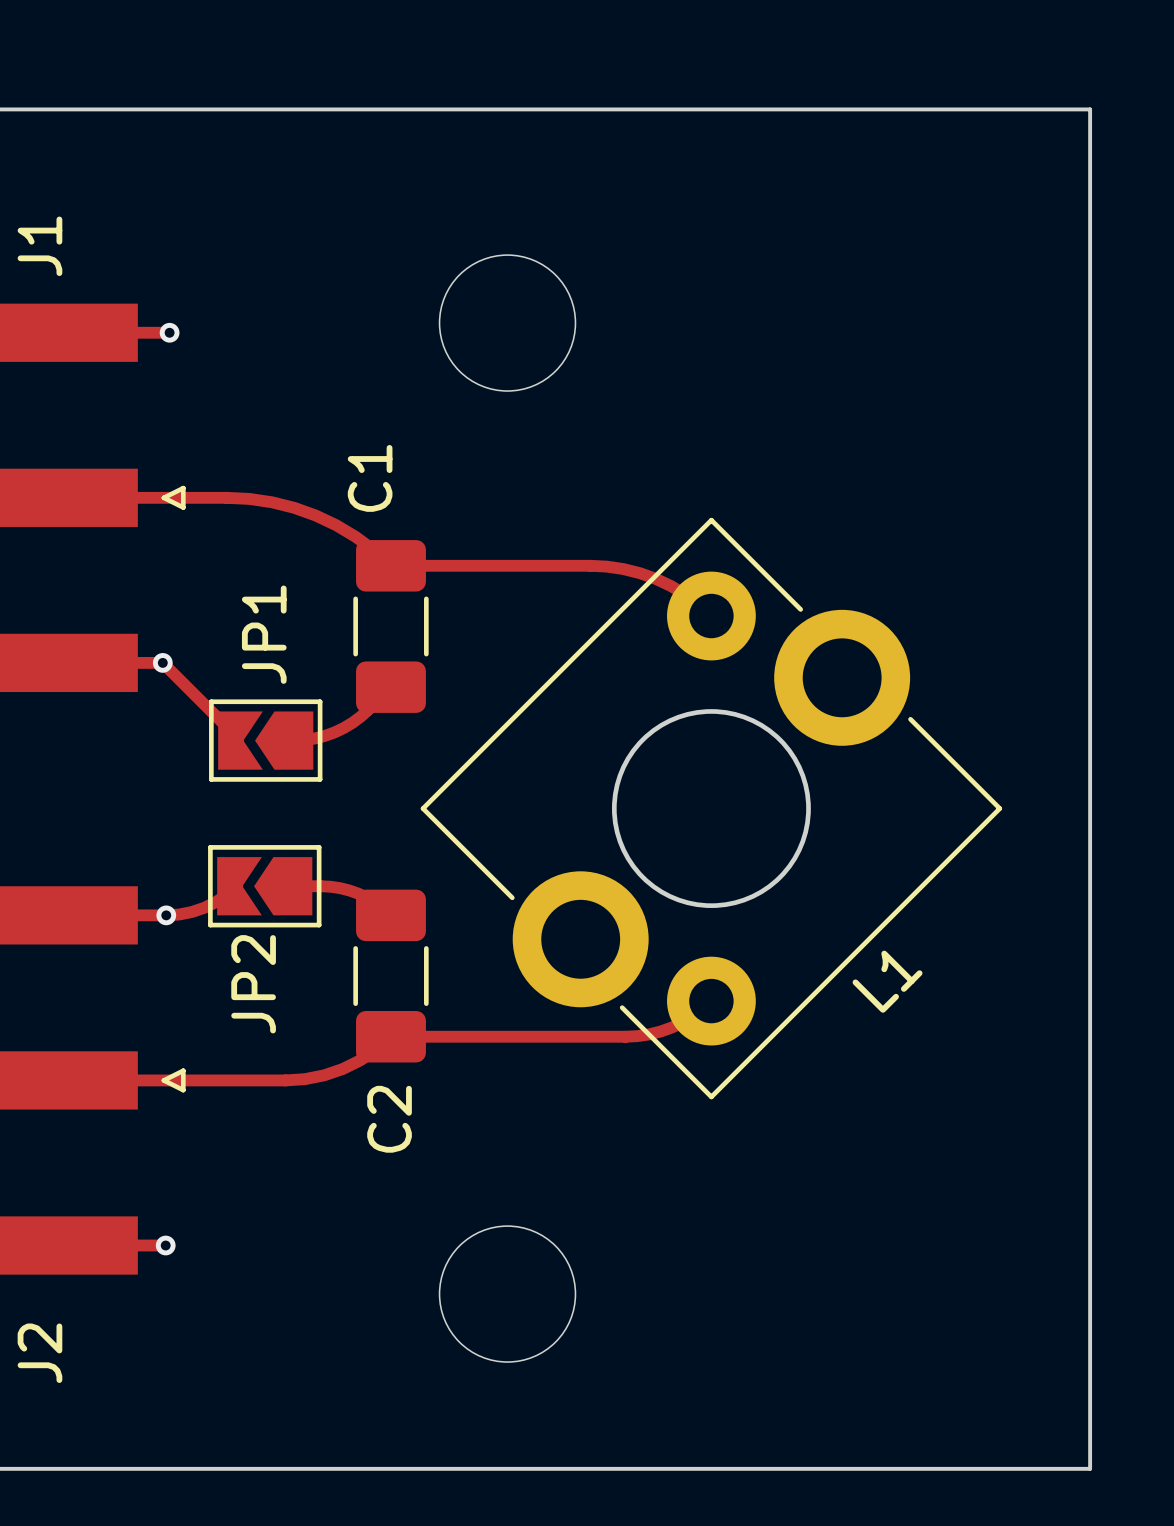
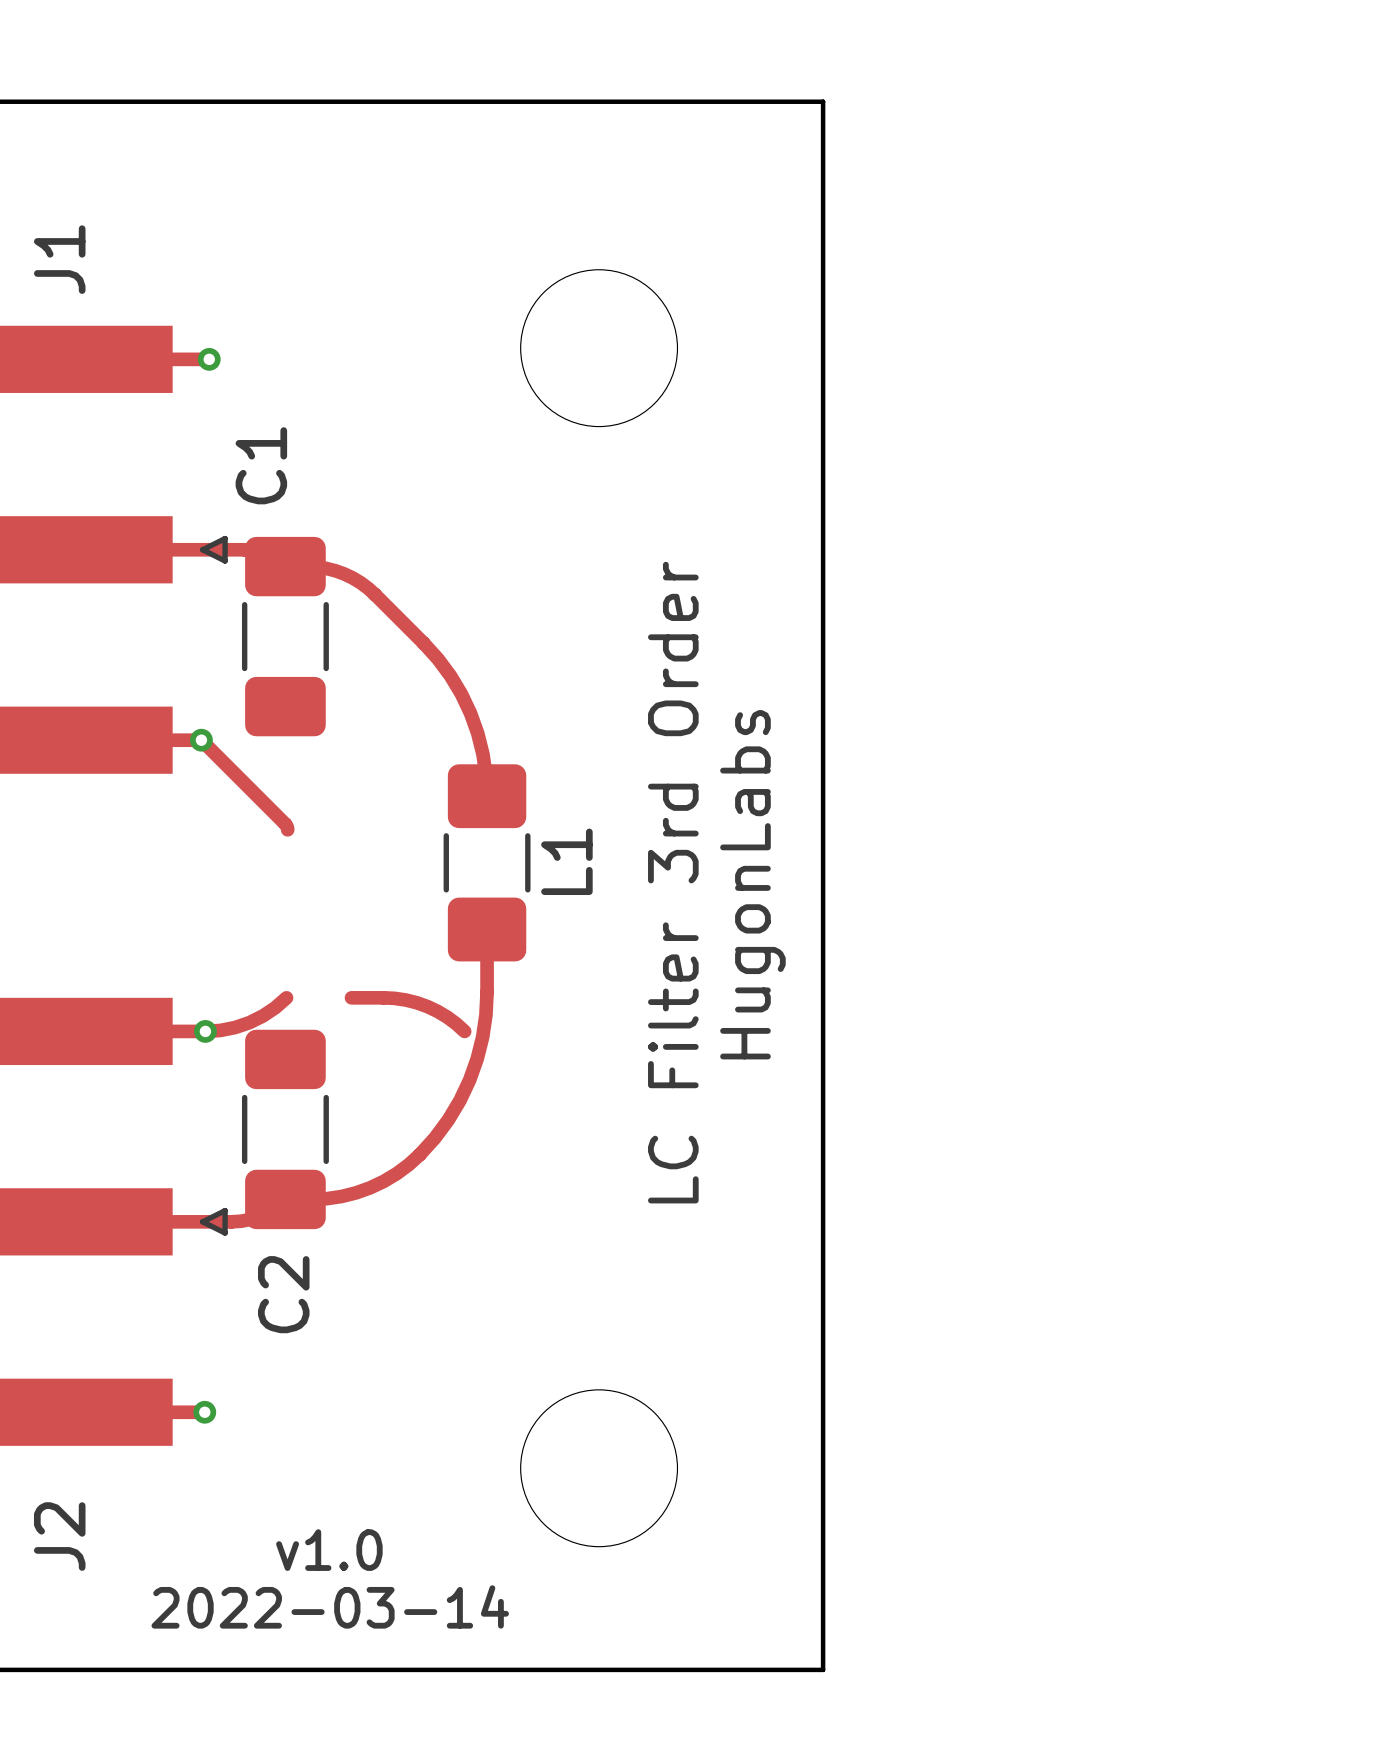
board edge: (701, 109) (1090, 109) (1090, 1468) (701, 1468) -> (823, 101) (823, 1669)
track: (200, 497) (249, 498) (294, 507) (336, 525) (355, 536) (390, 565) (590, 565) (623, 569) (639, 573) (671, 586) (685, 594) (711, 616) -> (244, 549) (266, 554) (285, 566) (326, 568) (352, 577) (375, 594) (423, 643) (450, 676) (470, 713) (482, 754) (487, 796)
L1 footprint: [420, 517, 1003, 1100] -> [443, 764, 531, 962]
C1 position: (390, 626) -> (285, 636)
track: (390, 687) (360, 716) (343, 728) (324, 736) (293, 740) -> none
JP1: (265, 740) -> none
text: none -> LC Filter 3rd Order (673, 882)
text: none -> HugonLabs (752, 884)
JP2: (264, 886) -> none
C2 position: (390, 976) -> (285, 1129)
L1 name position: L1 (887, 981) -> L1 (566, 861)
track: (711, 1001) (682, 1022) (649, 1034) (625, 1036) (390, 1036) (360, 1060) (324, 1075) (285, 1080) (188, 1080) -> (487, 929) (487, 992) (482, 1037) (469, 1080) (448, 1119) (434, 1137) (408, 1164) (370, 1187) (326, 1198) (285, 1199) (260, 1216) (231, 1221)
text: none -> v1.0 (329, 1550)
text: none -> 2022-03-14 (330, 1606)

